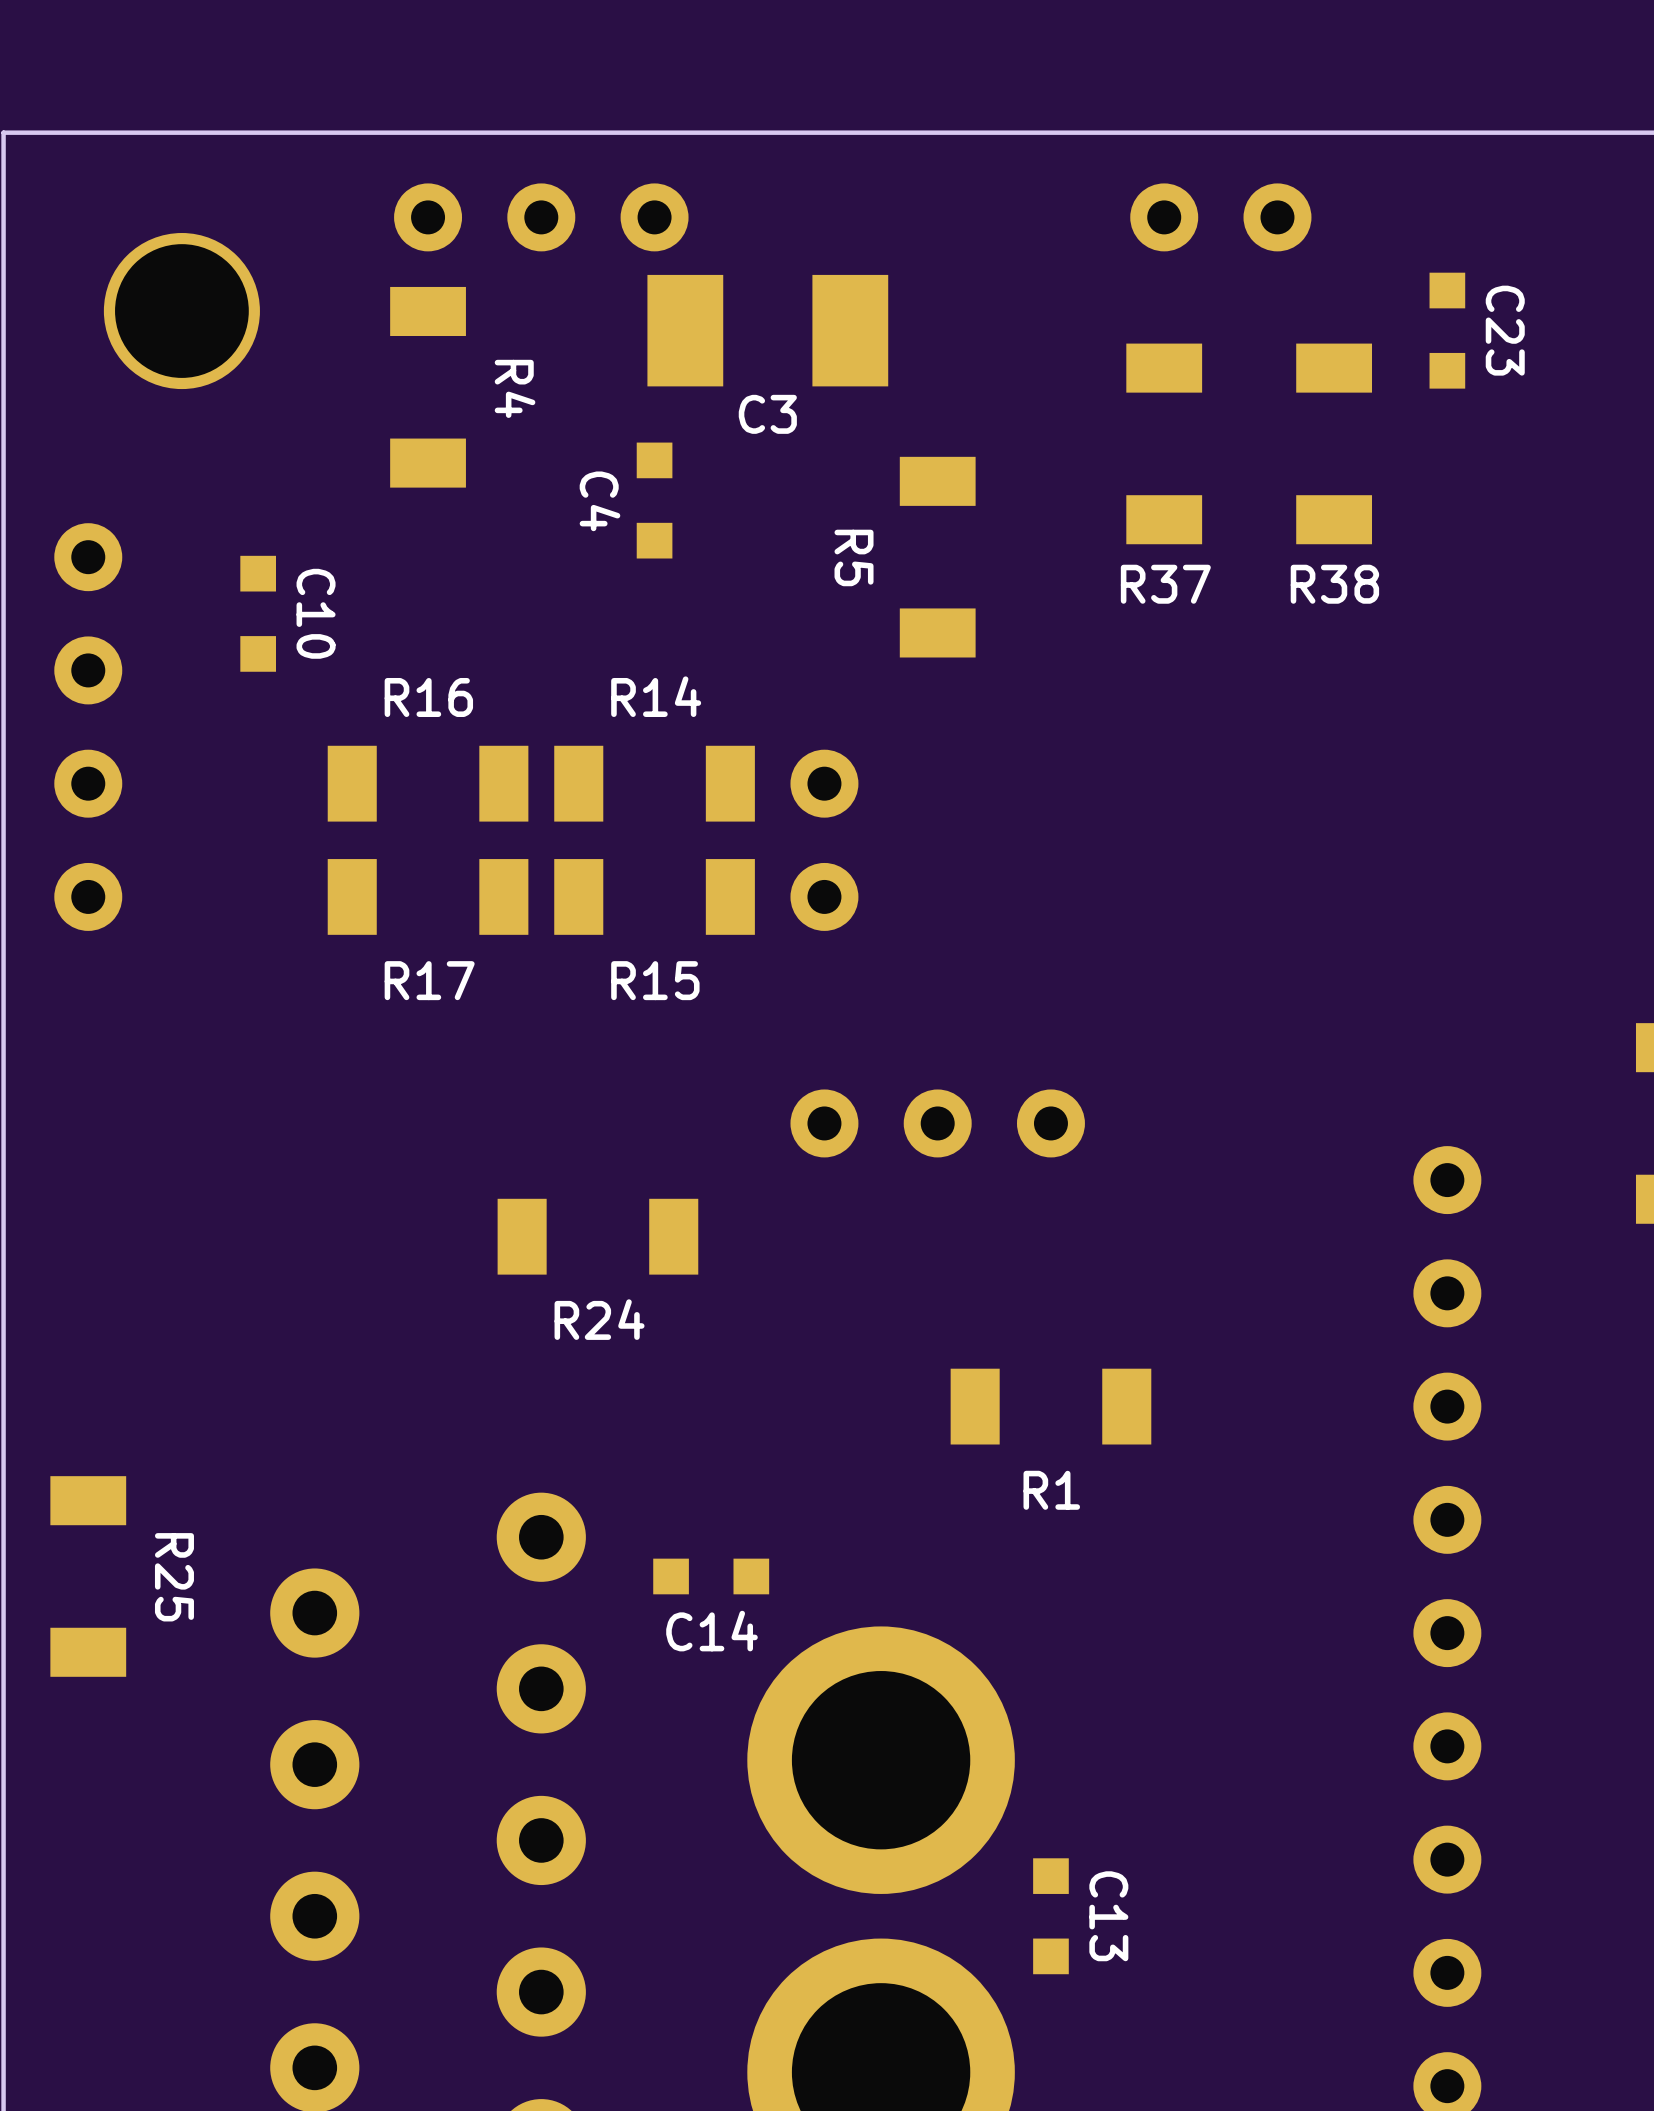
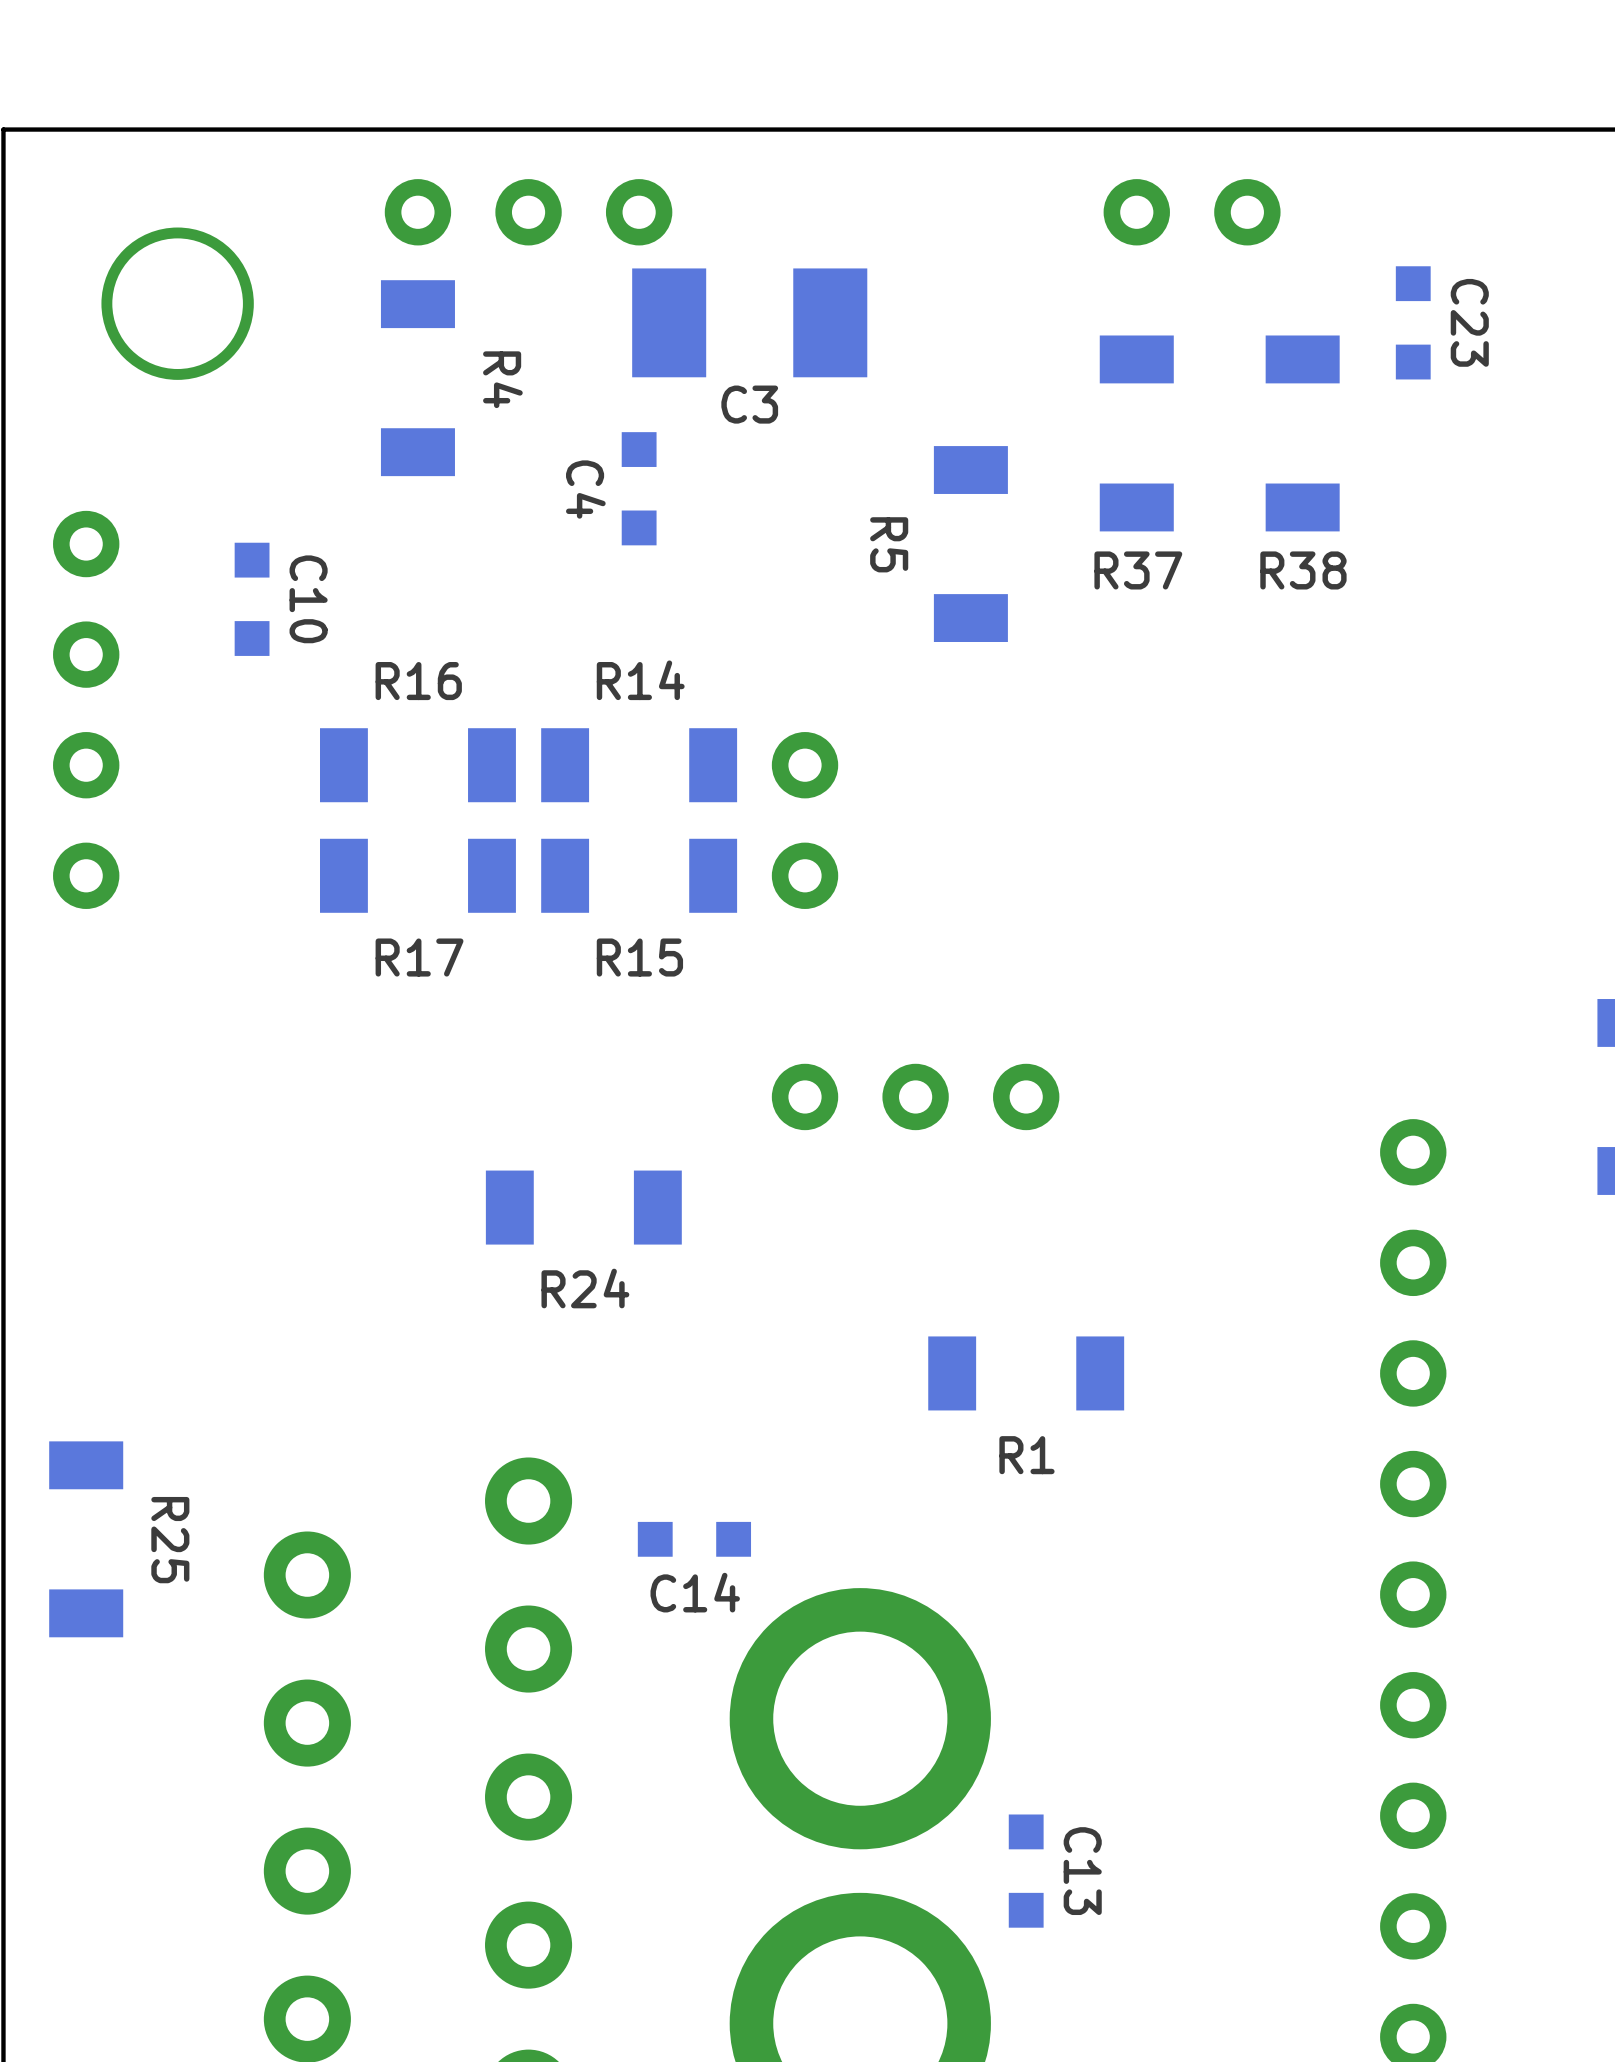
R5 position: (937, 557) -> (970, 544)

